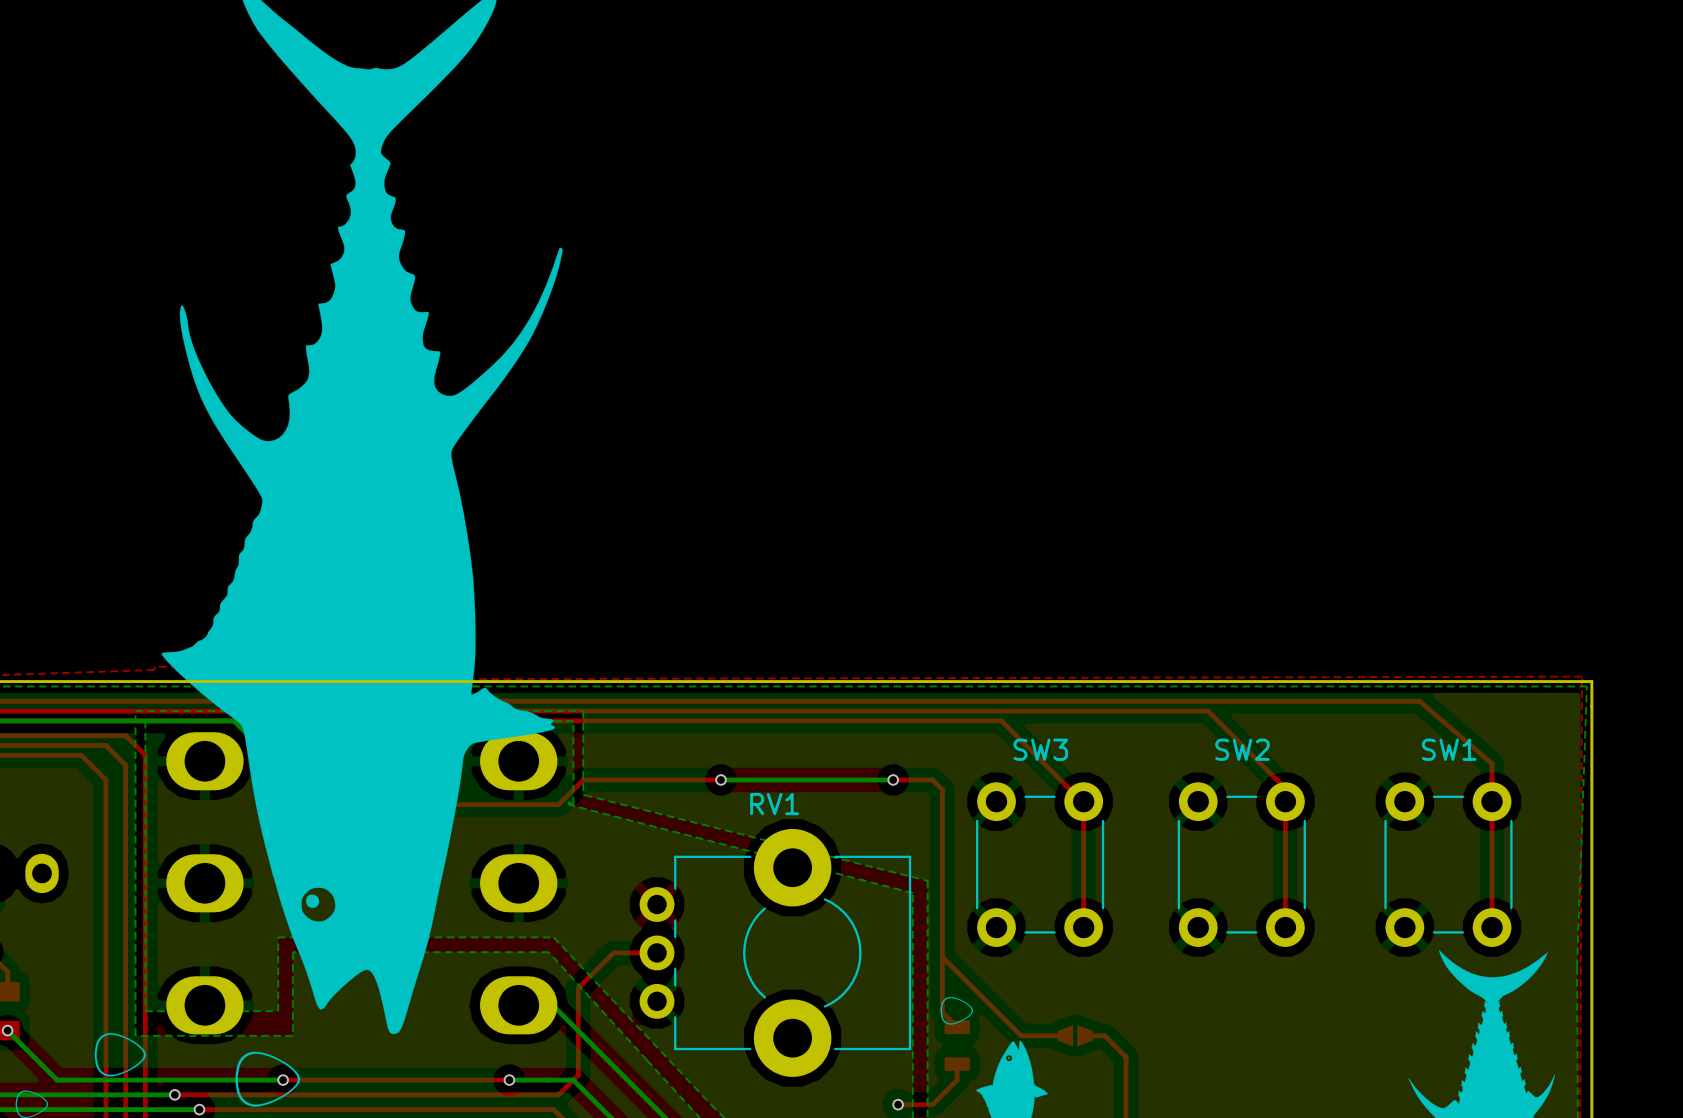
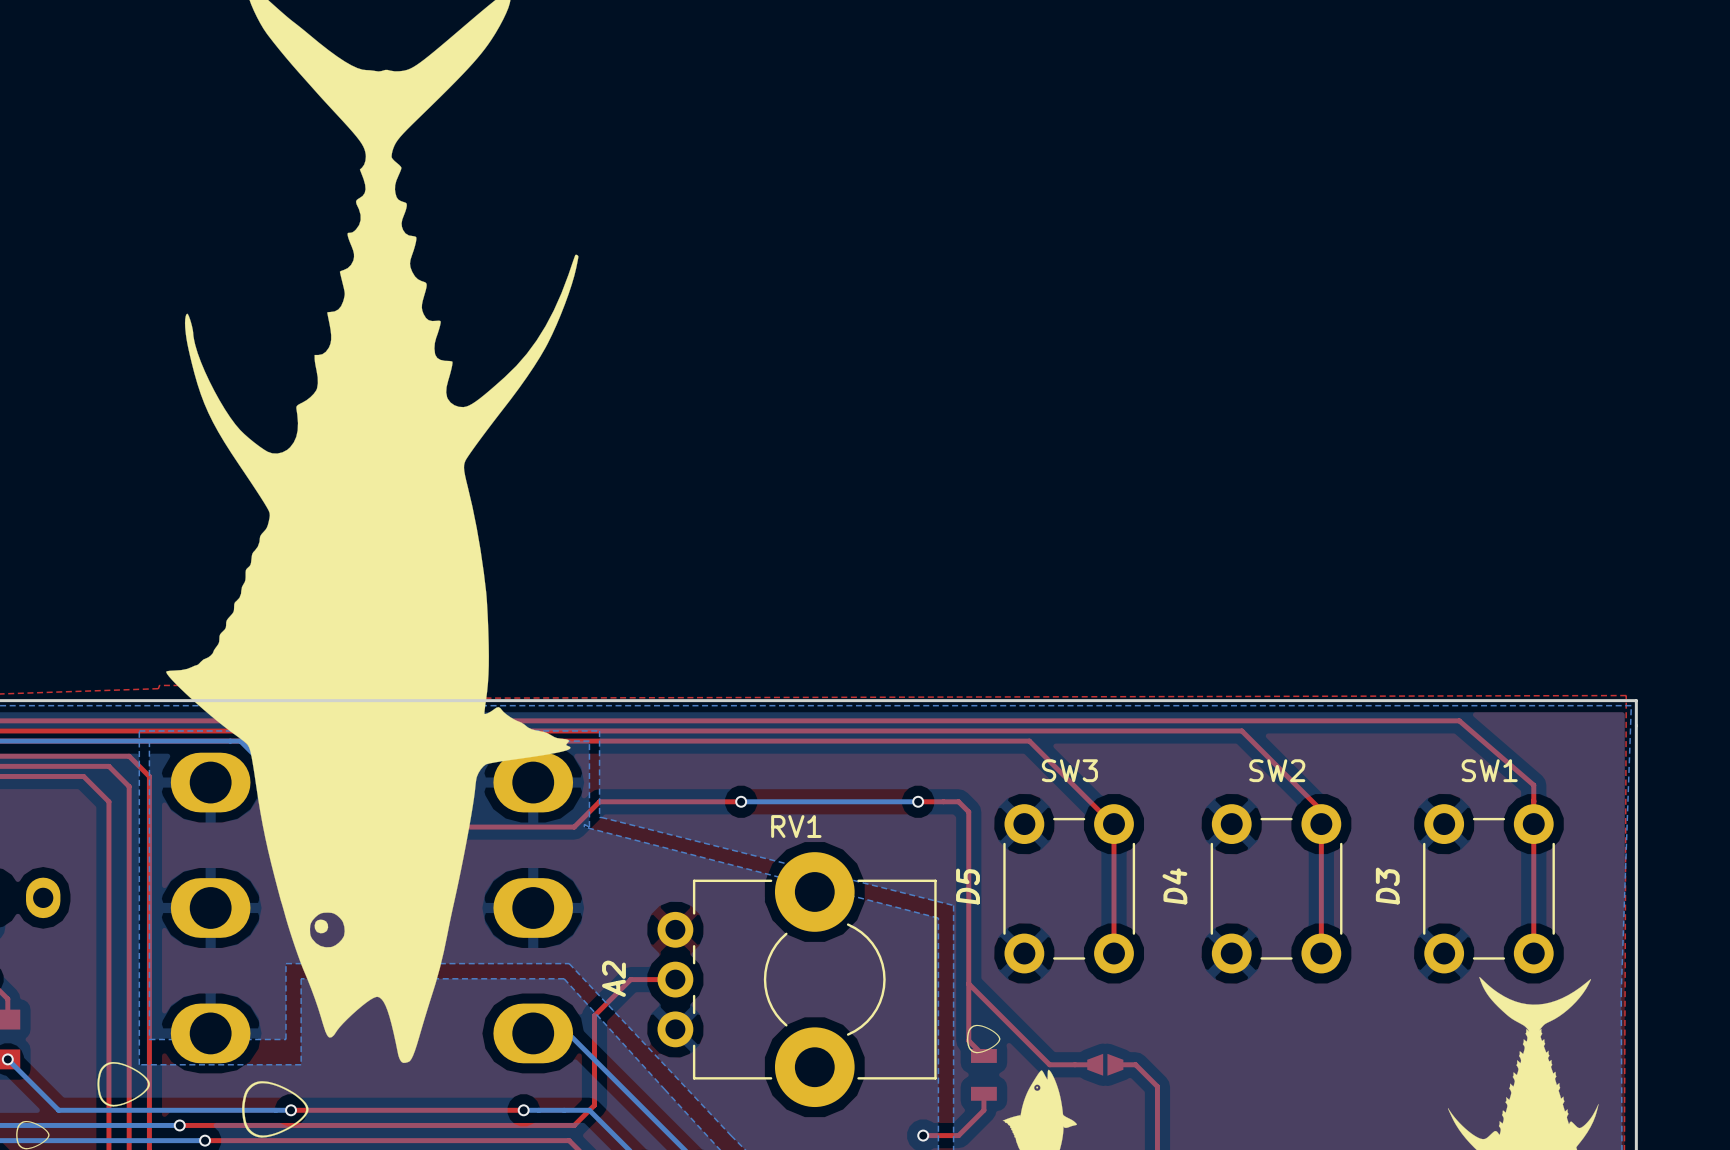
text: none -> D3 (1387, 886)
text: none -> D5 (968, 886)
text: none -> D4 (1174, 886)
text: none -> A2 (613, 978)

